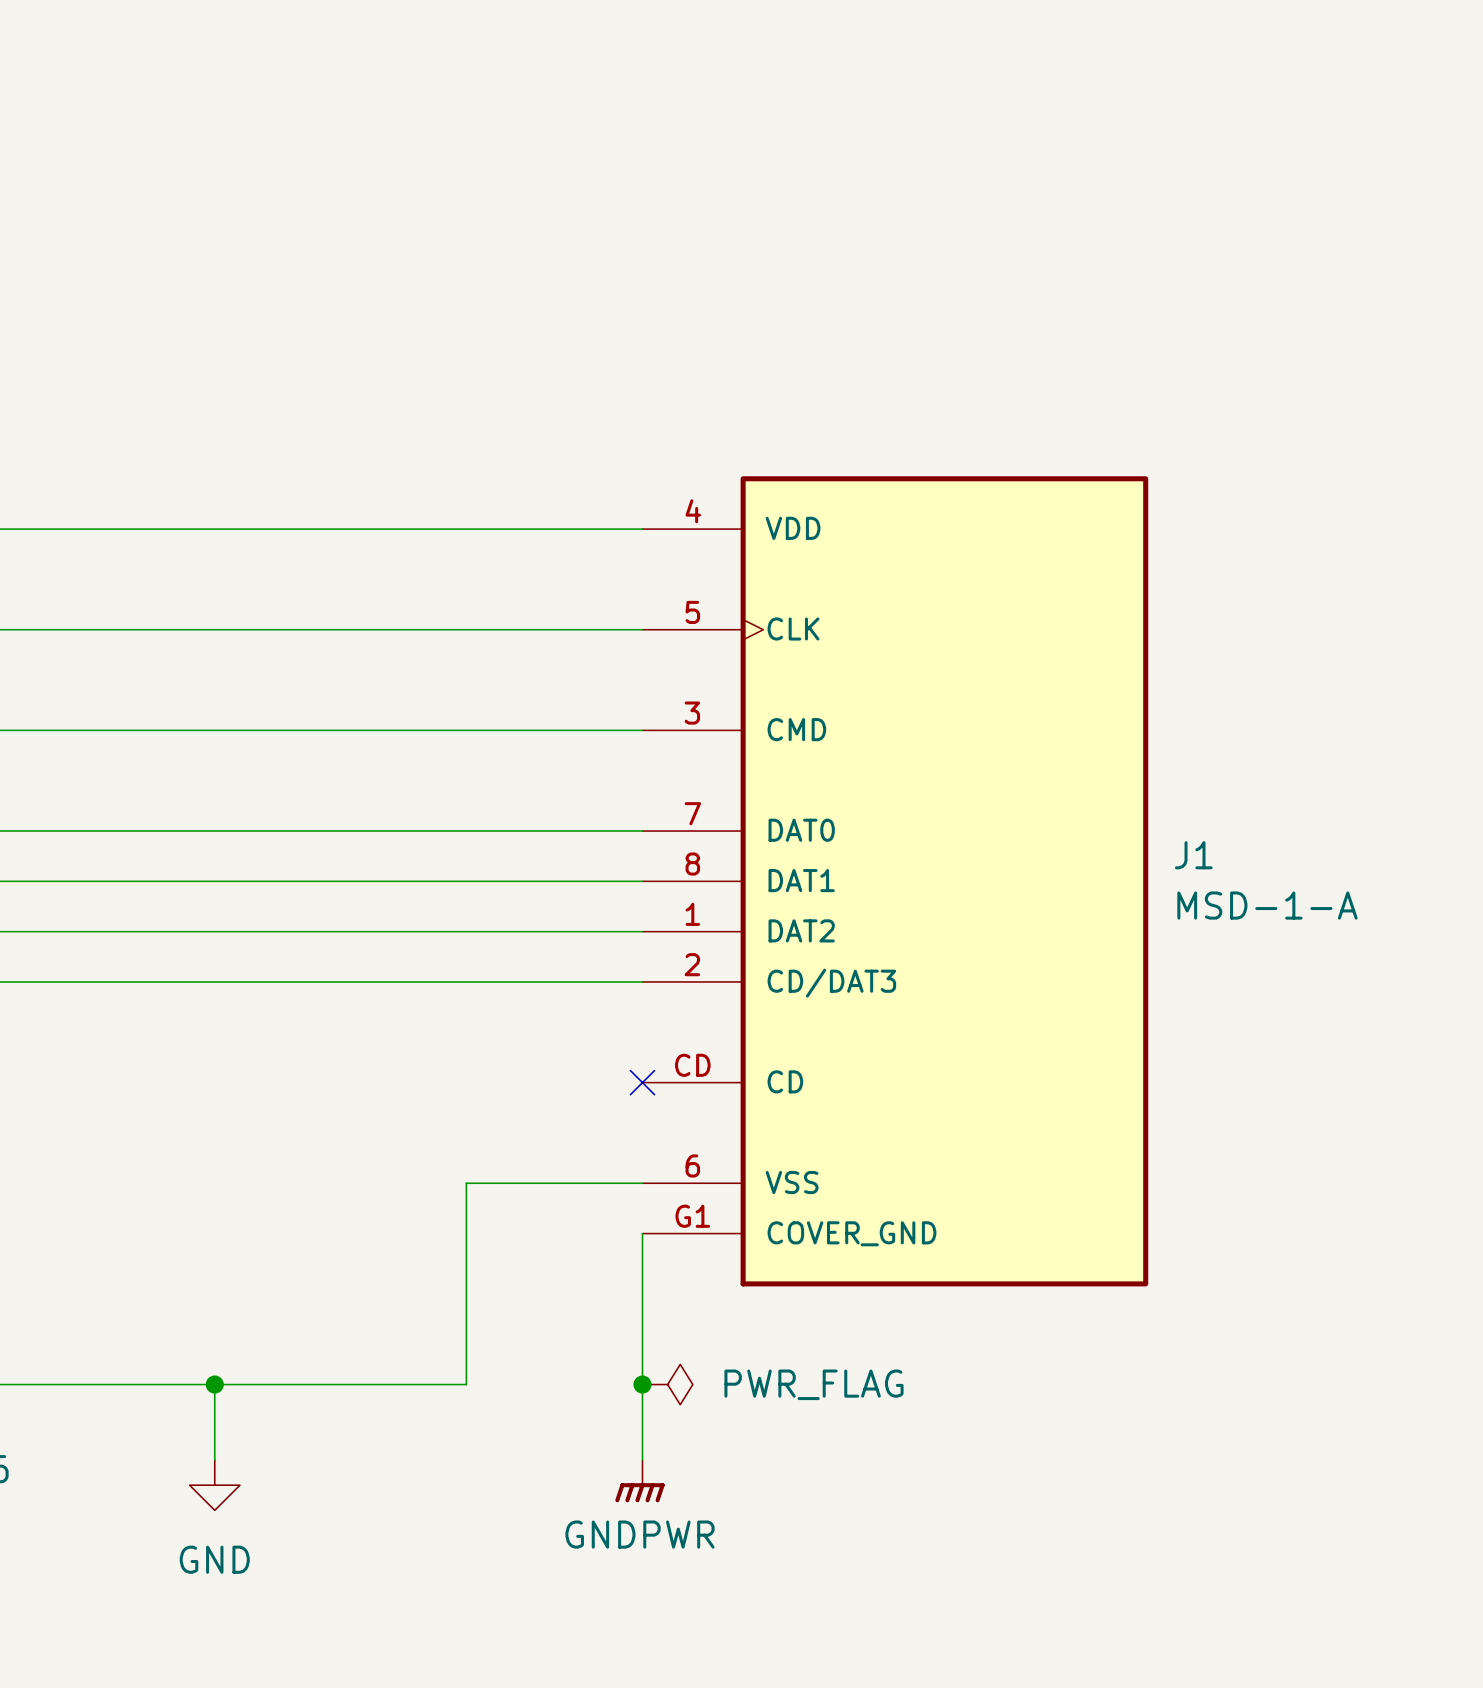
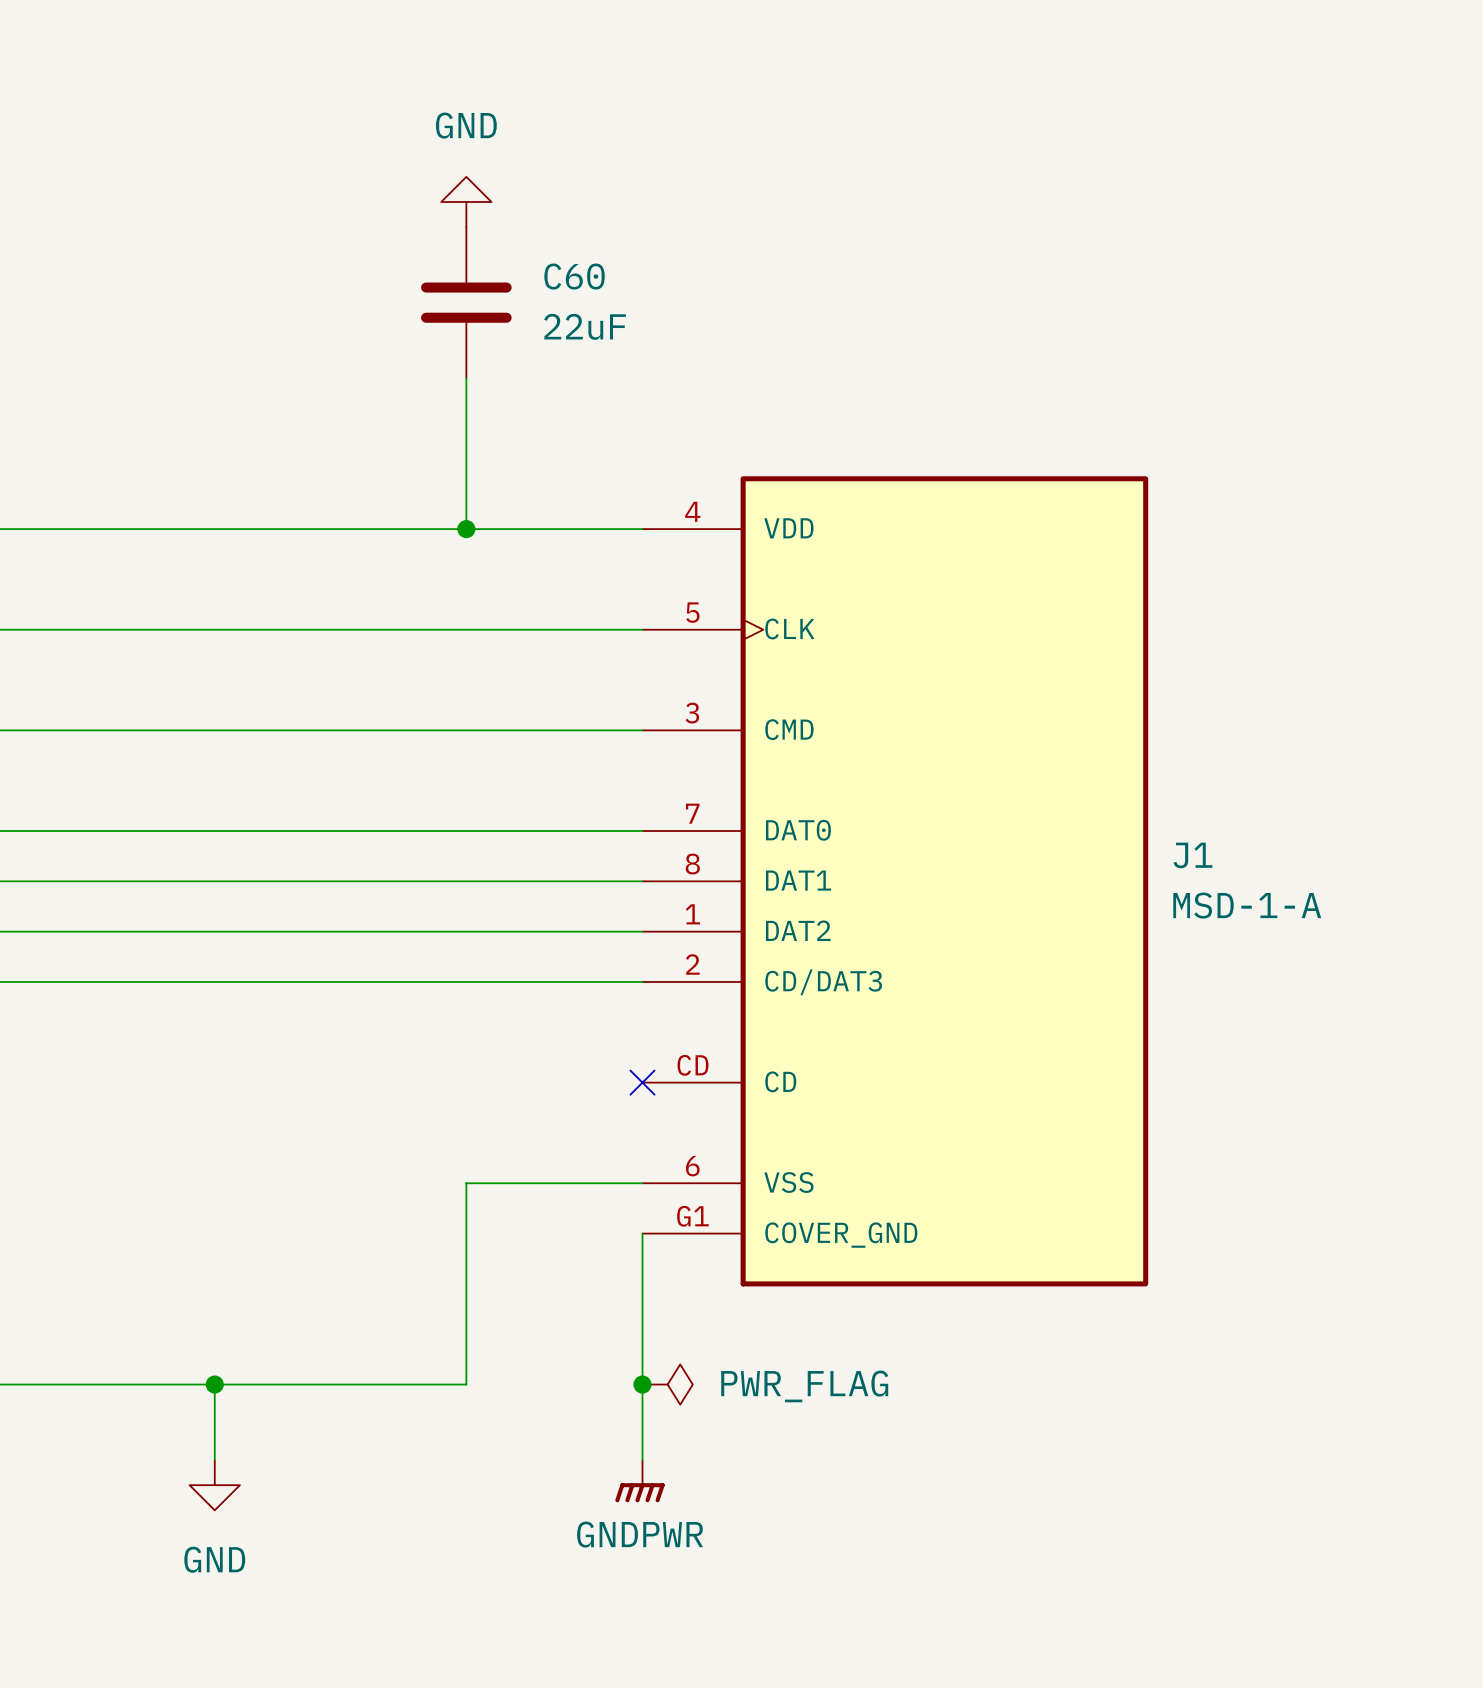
power symbol: none -> GND (466, 202)
C60: none -> 22uF (466, 302)
wire: none -> (466, 378) (466, 529)
junction: none -> (466, 529)

